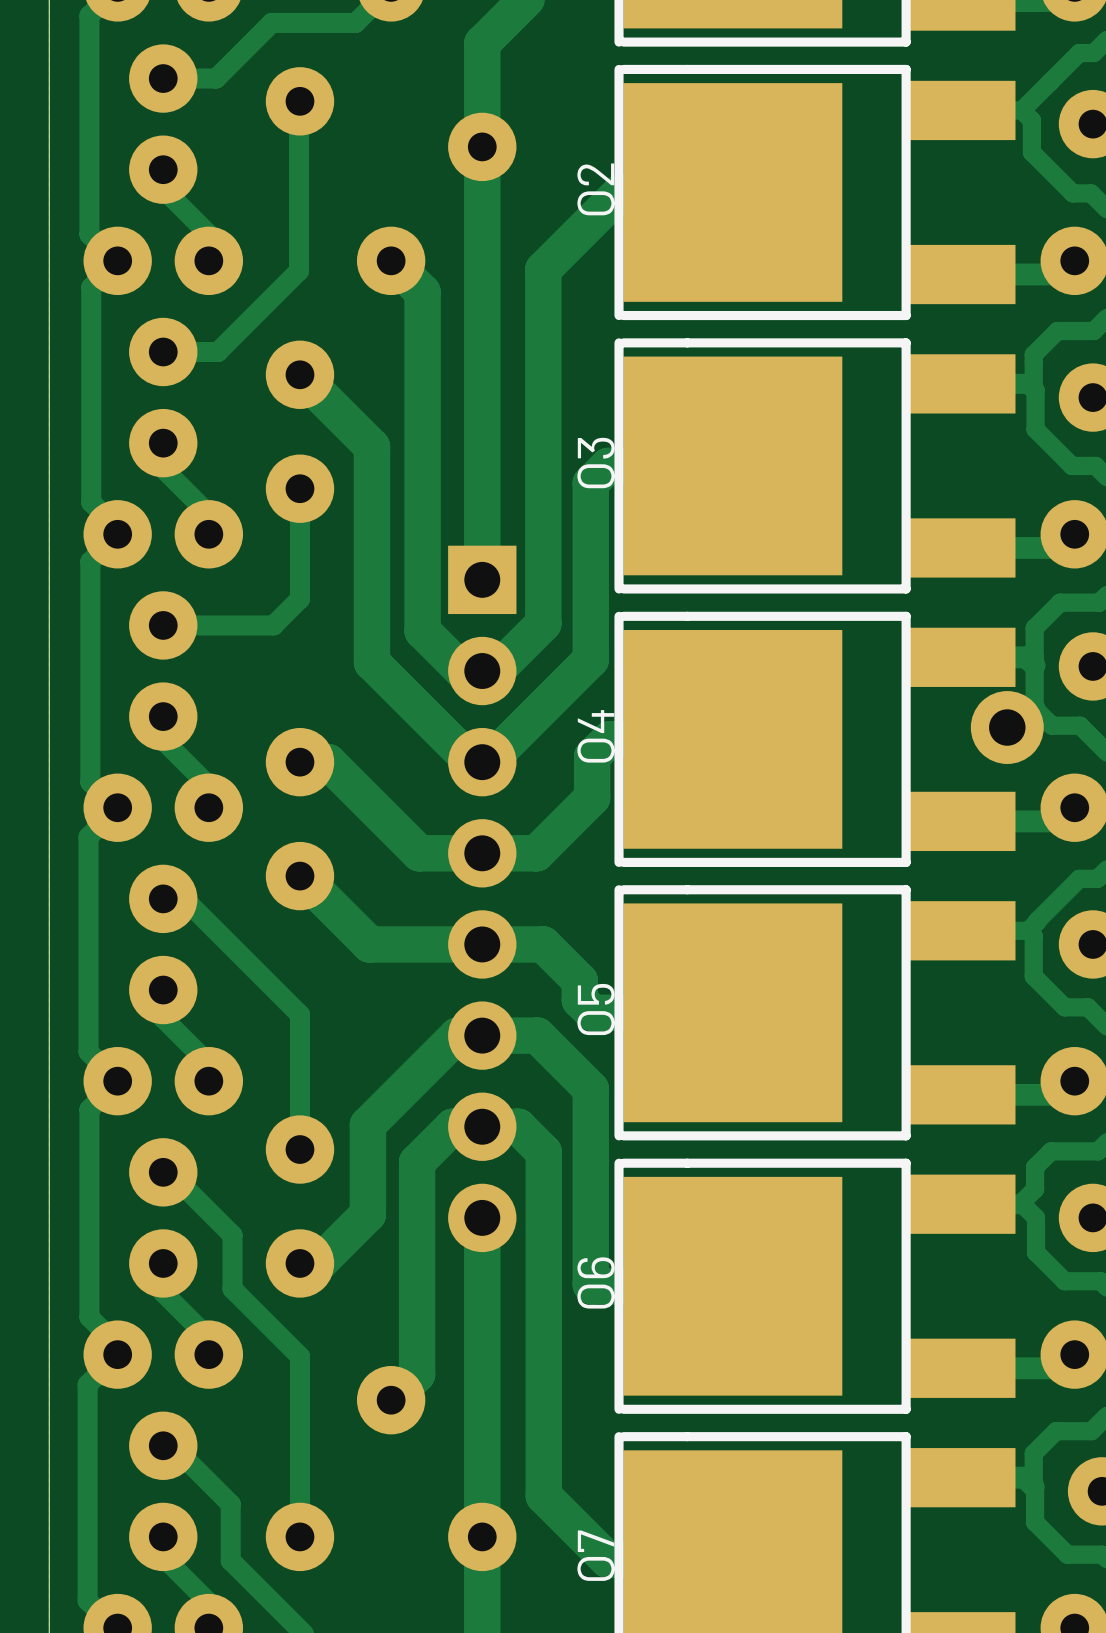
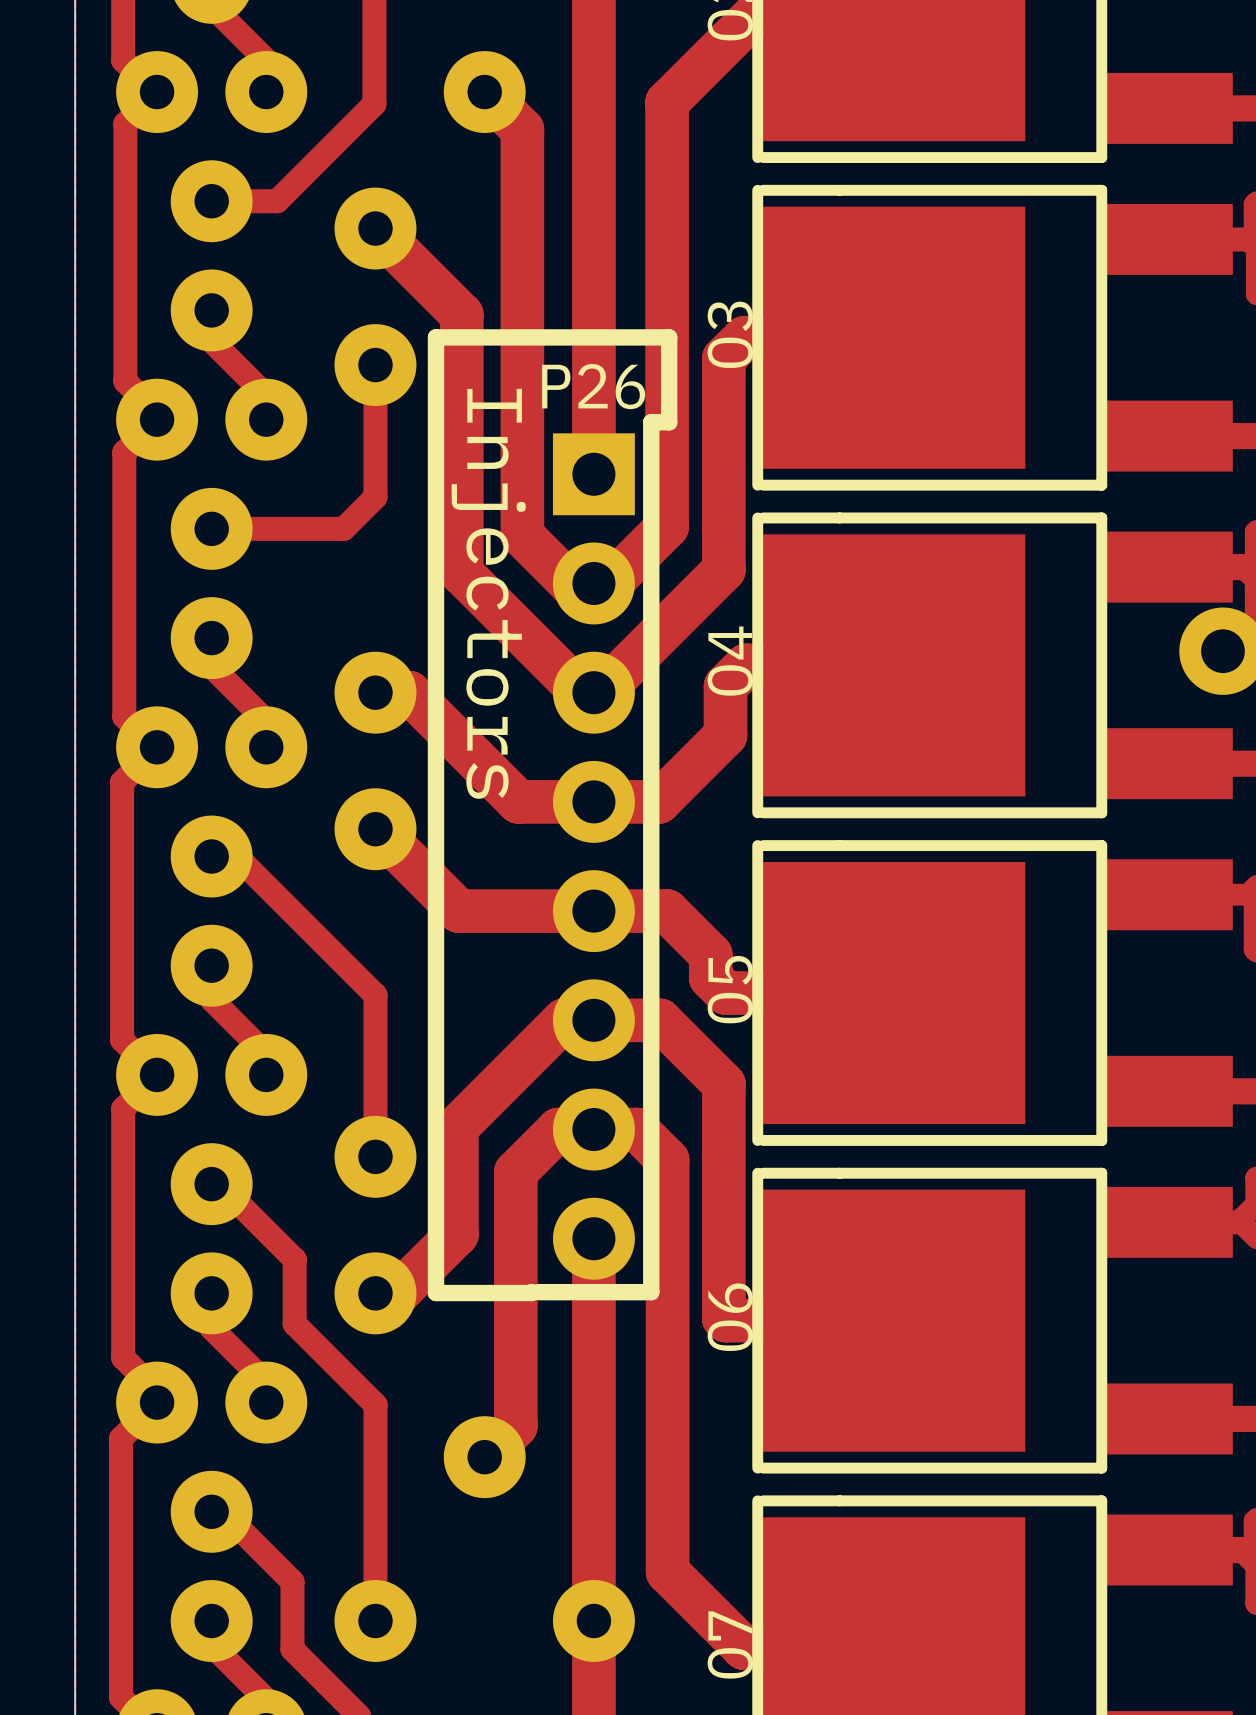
text: none -> P26 (593, 386)
text: none -> Injectors (488, 593)
line: none -> (531, 1292) (436, 1293) (436, 337) (669, 337) (669, 422) (651, 422) (651, 1292) (538, 1292)

